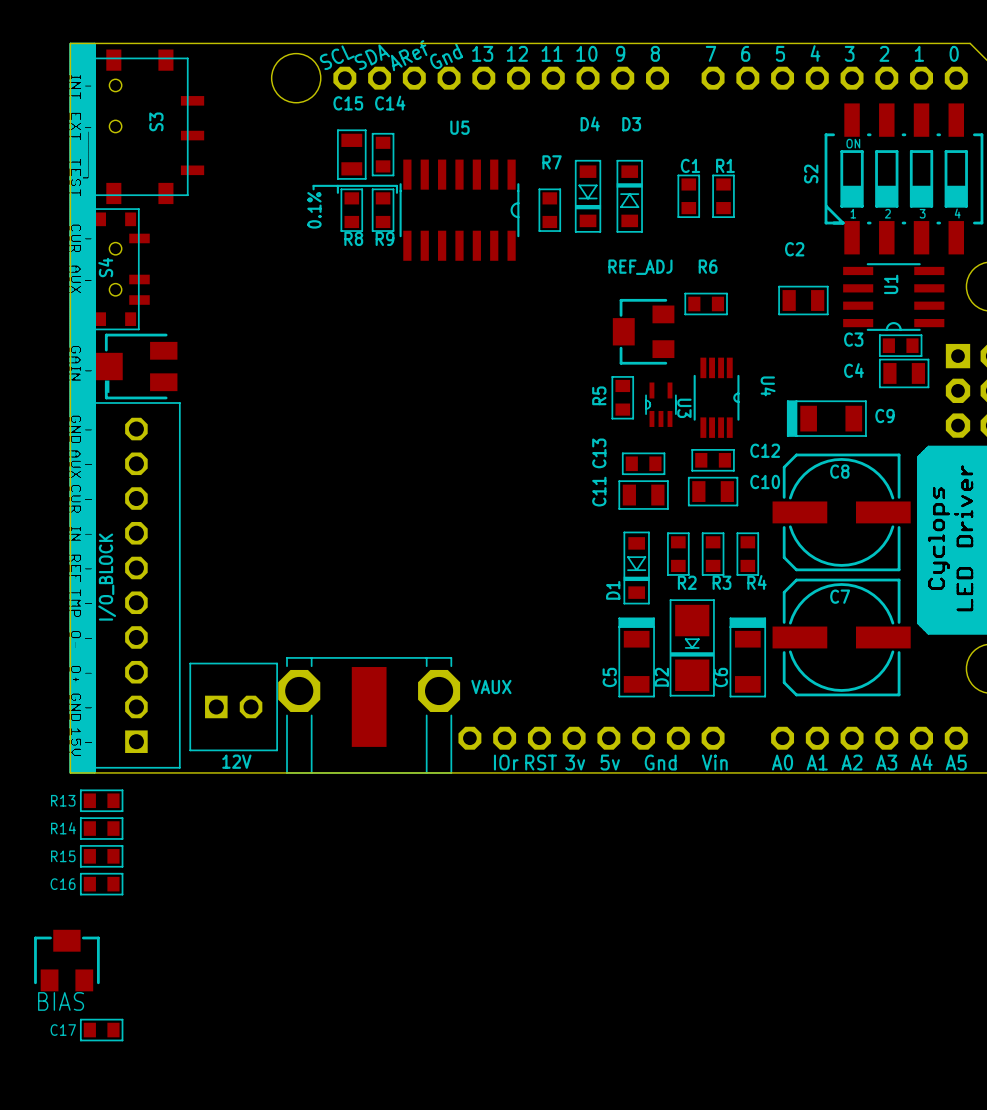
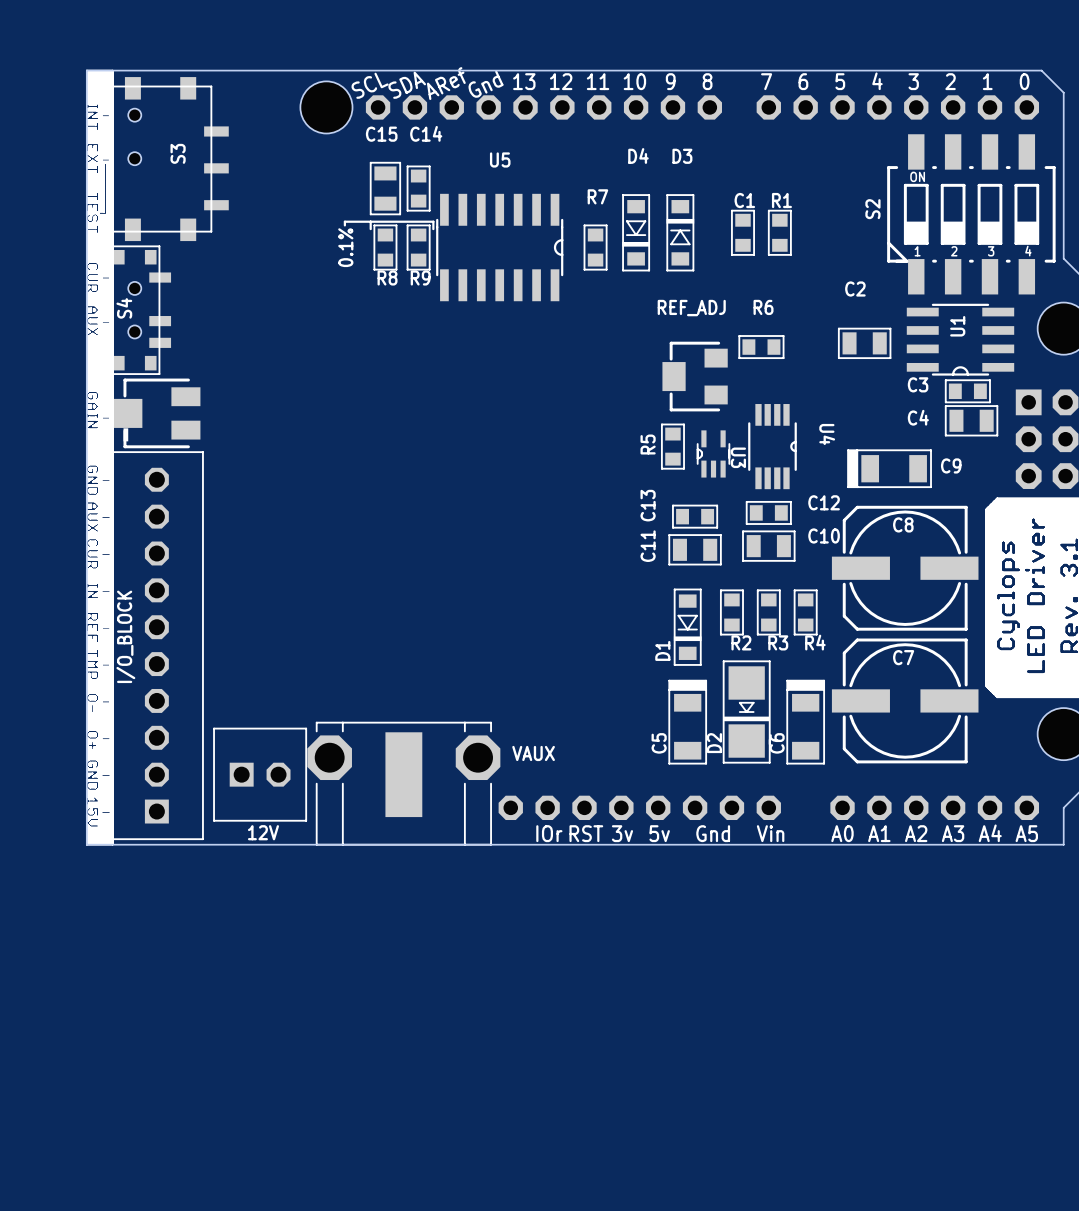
R13: (101, 800) -> none
R14: (101, 828) -> none
R15: (101, 856) -> none
C16: (101, 884) -> none
BIAS: (66, 960) -> none
C17: (101, 1030) -> none

